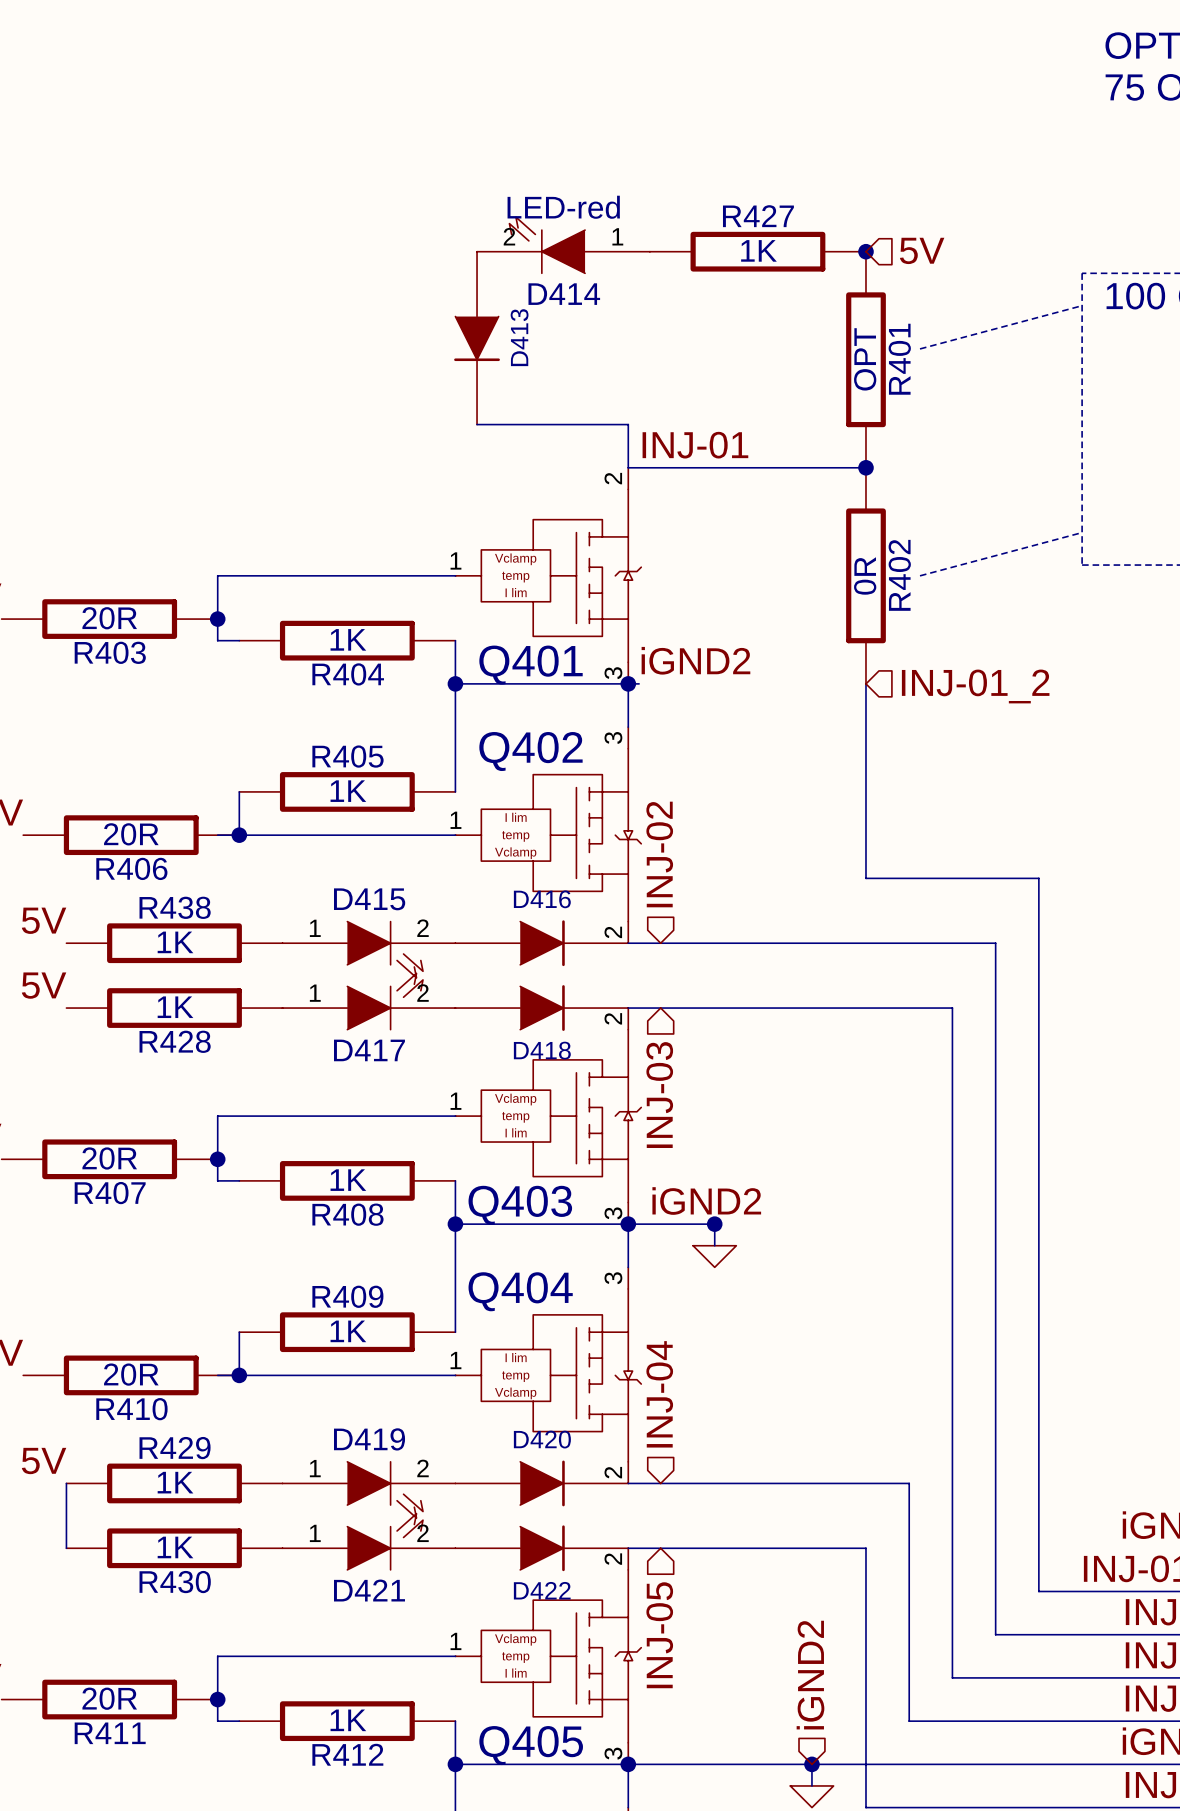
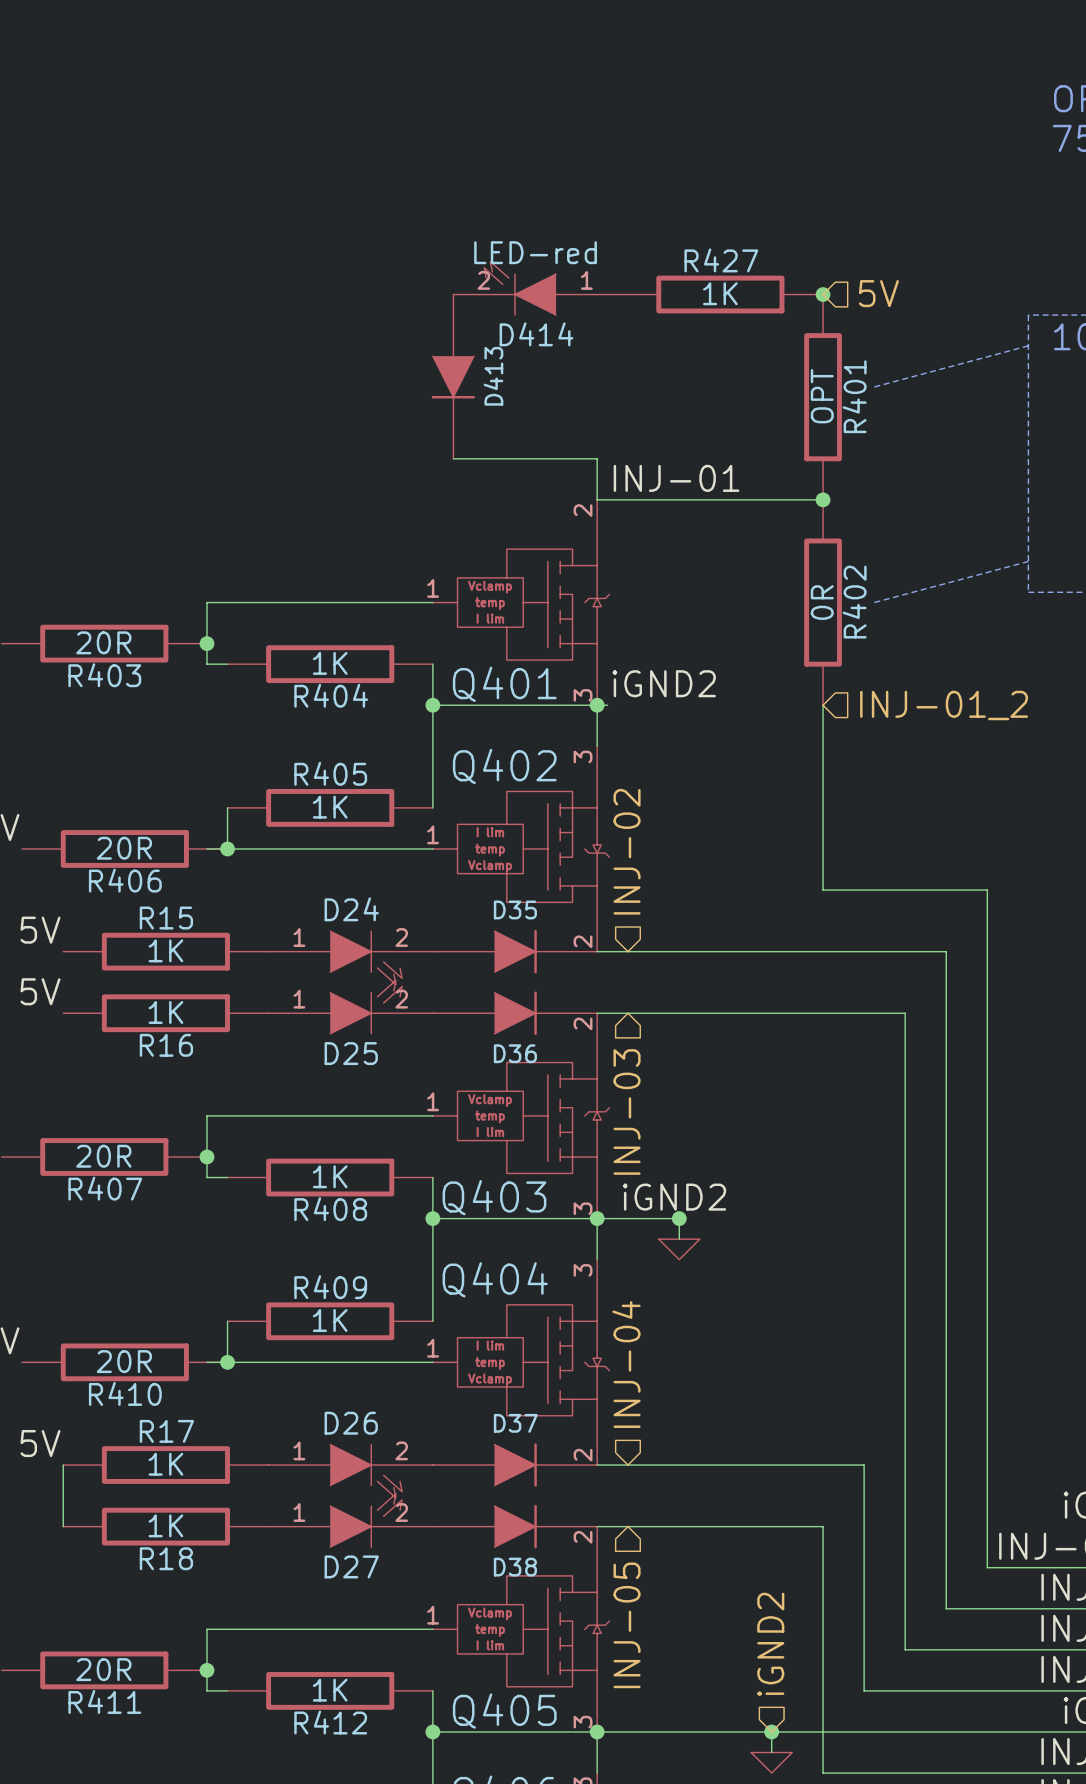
D415 name: D415 (369, 899) -> D24 (351, 909)
D416 name: D416 (542, 899) -> D35 (515, 909)
R438 name: R438 (175, 907) -> R15 (166, 918)
R428 name: R428 (175, 1041) -> R16 (166, 1045)
D417 name: D417 (369, 1050) -> D25 (351, 1053)
D418 name: D418 (542, 1050) -> D36 (515, 1053)
D419 name: D419 (369, 1439) -> D26 (351, 1423)
D420 name: D420 (542, 1439) -> D37 (515, 1423)
R429 name: R429 (175, 1448) -> R17 (166, 1431)
R430 name: R430 (175, 1582) -> R18 (166, 1558)
D421 name: D421 (369, 1590) -> D27 (351, 1566)
D422 name: D422 (542, 1590) -> D38 (515, 1567)

